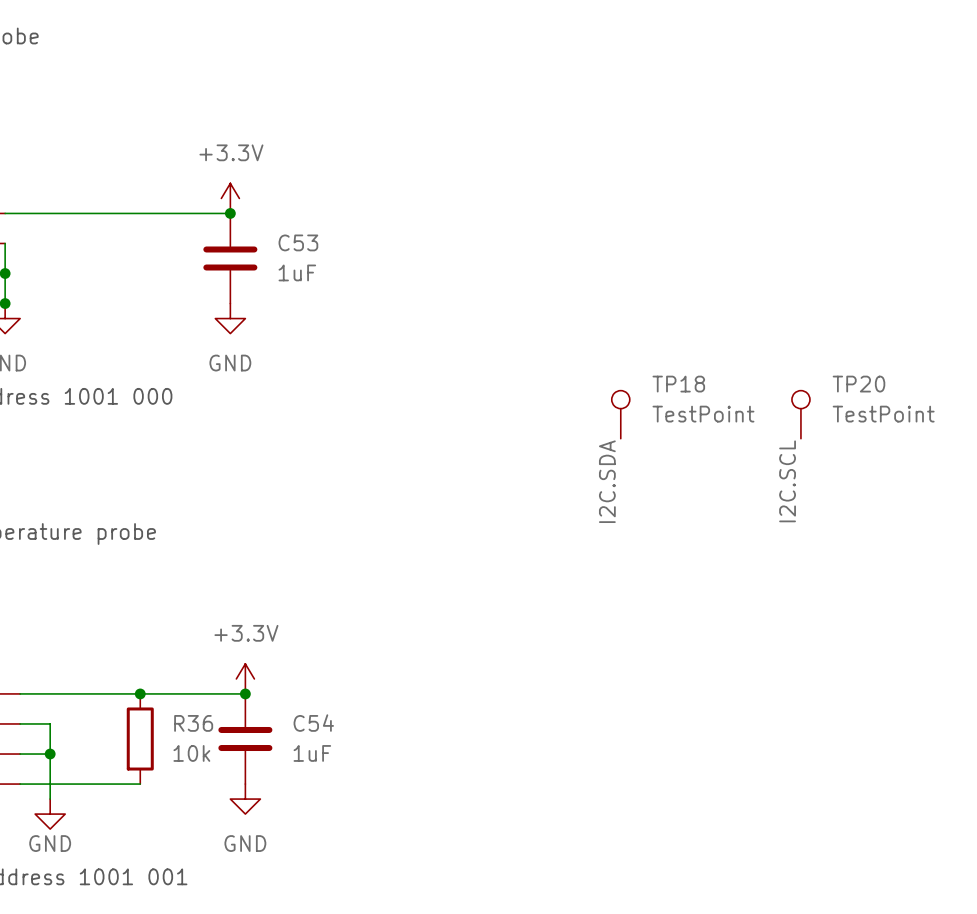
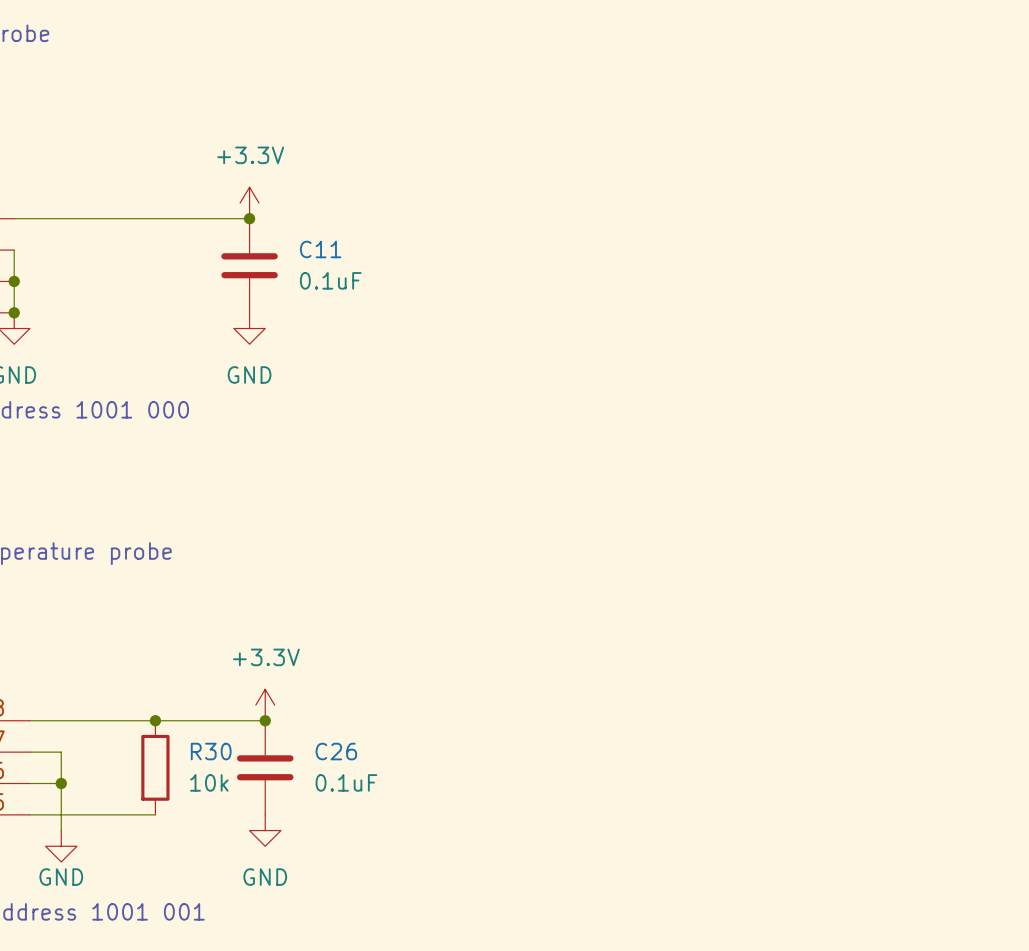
C53 name: C53 (298, 242) -> C11 (320, 249)
C53 value: 1uF (297, 272) -> 0.1uF (330, 280)
TP18: TestPoint (620, 414) -> none
TP20: TestPoint (800, 414) -> none
label: I2C.SDA (607, 481) -> none
label: I2C.SCL (787, 481) -> none
R36 name: R36 (193, 723) -> R30 (211, 751)
C54 name: C54 (313, 723) -> C26 (336, 751)
C54 value: 1uF (312, 753) -> 0.1uF (346, 782)

